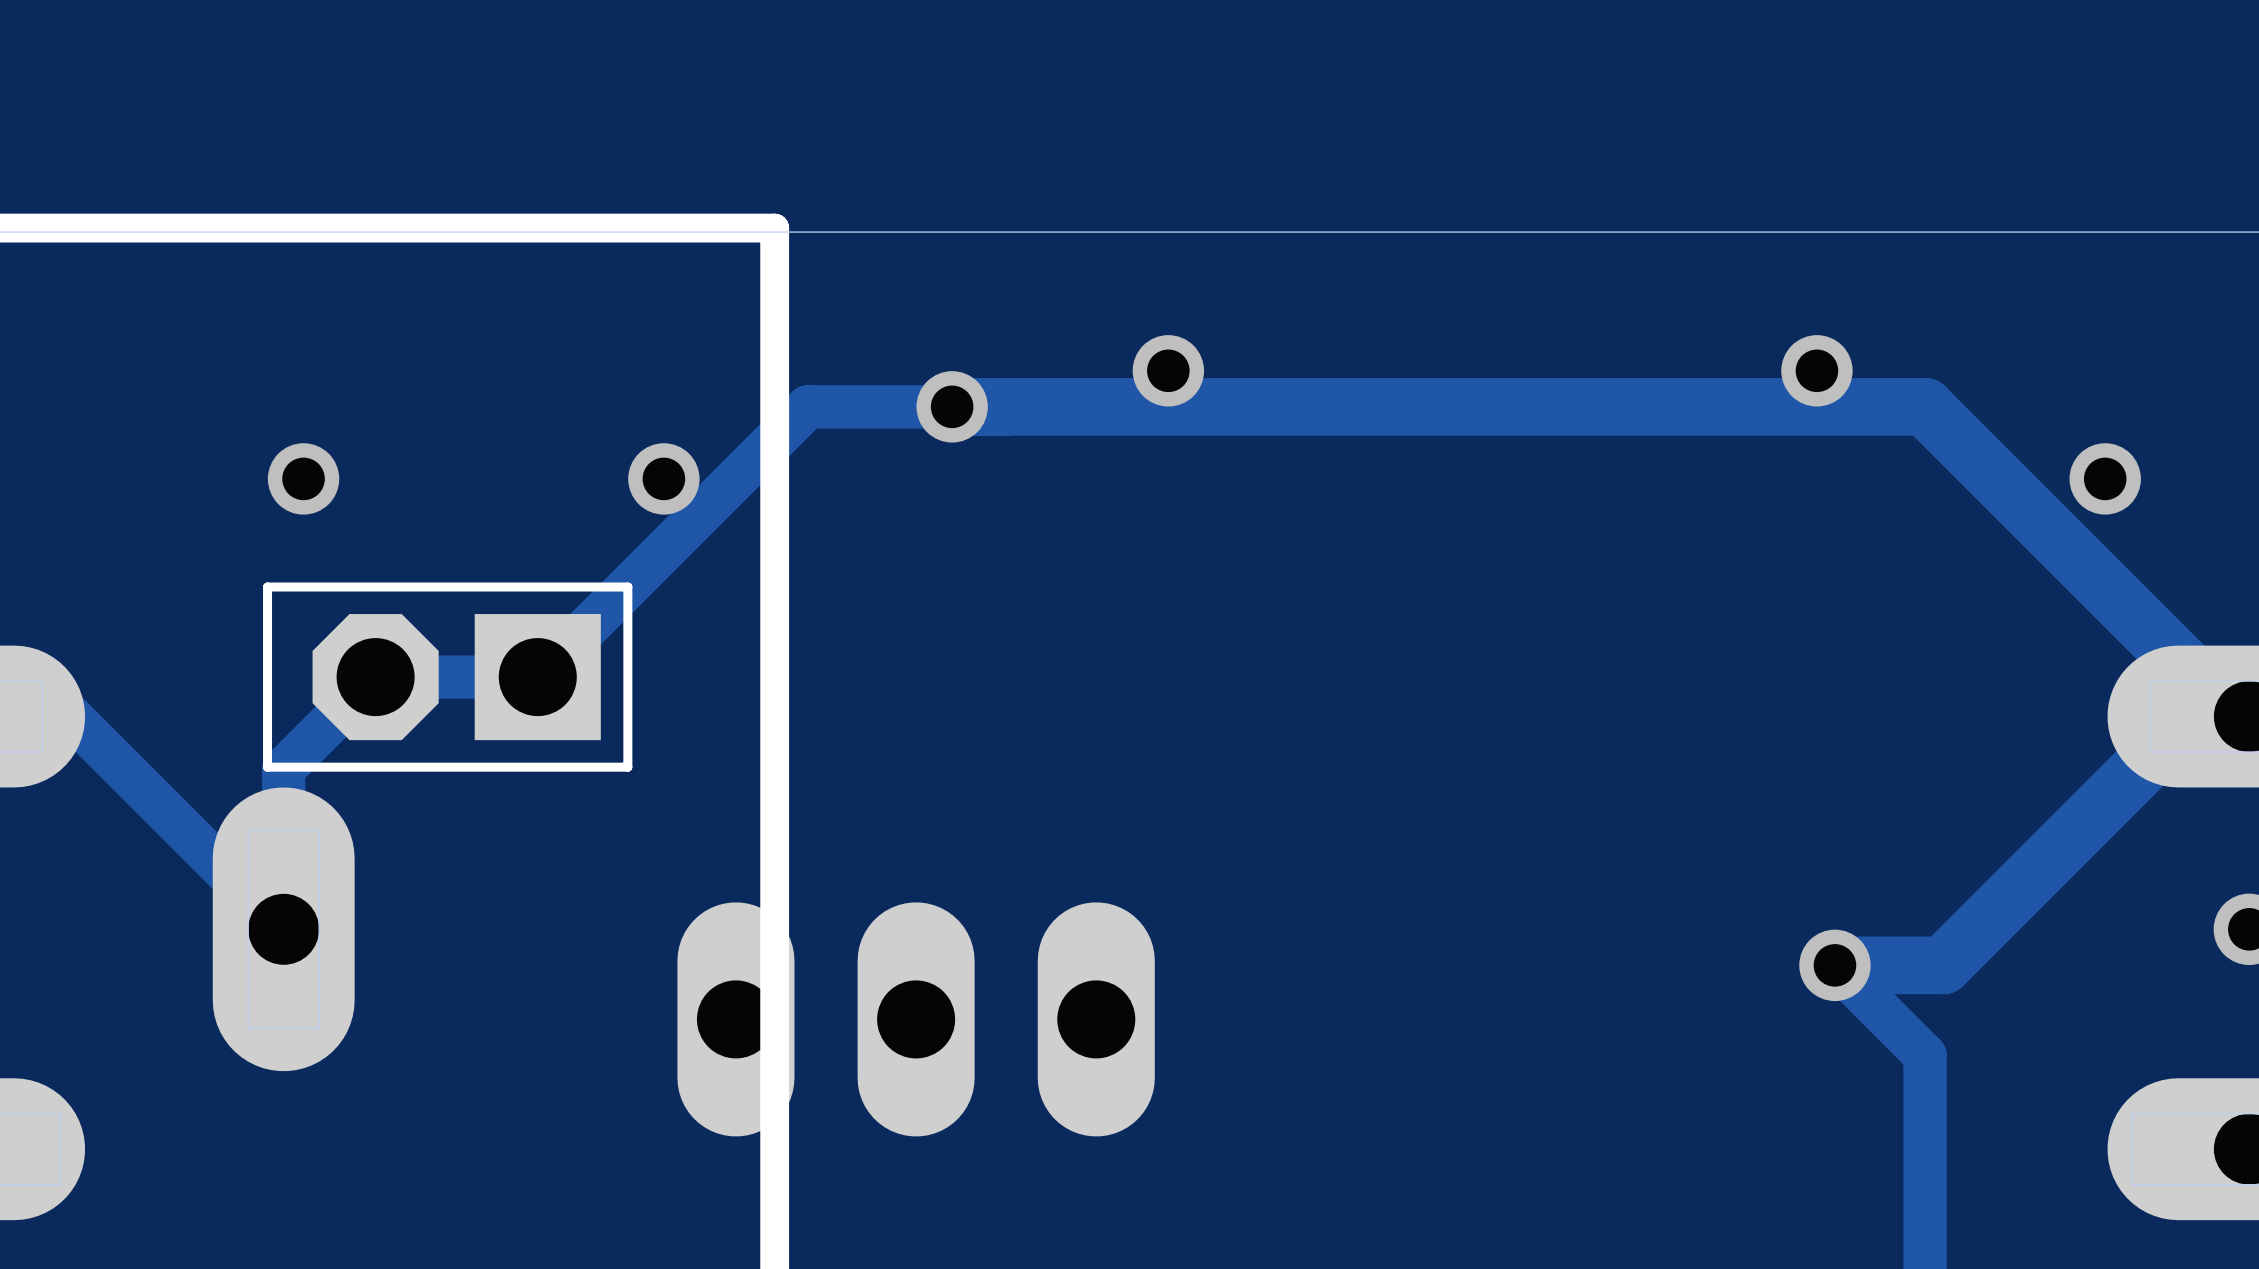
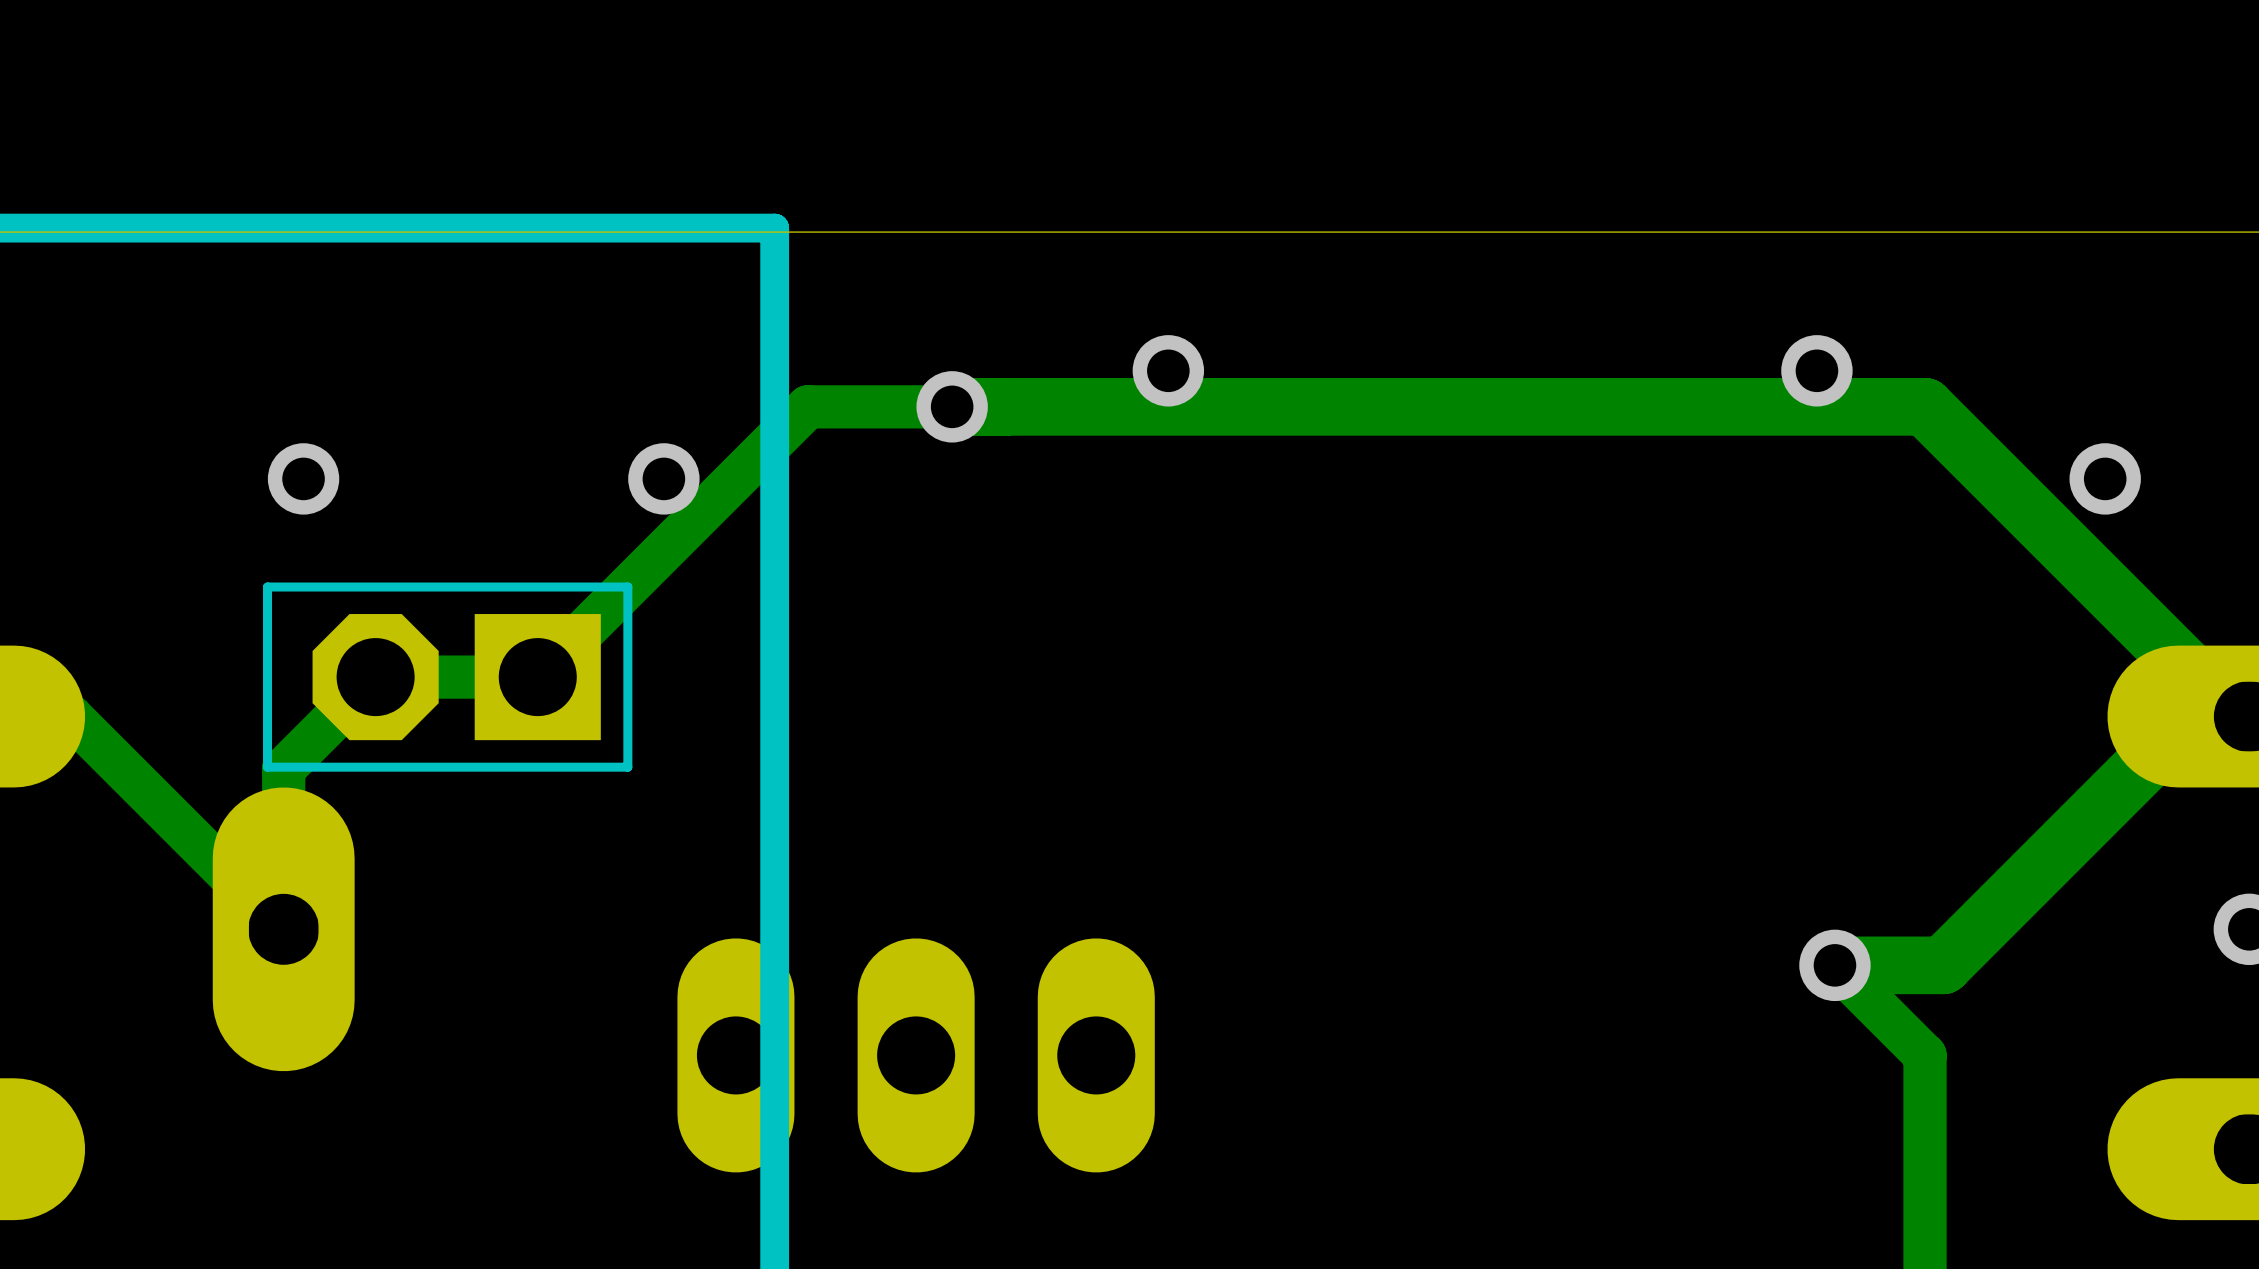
part position: (916, 1019) -> (916, 1055)

